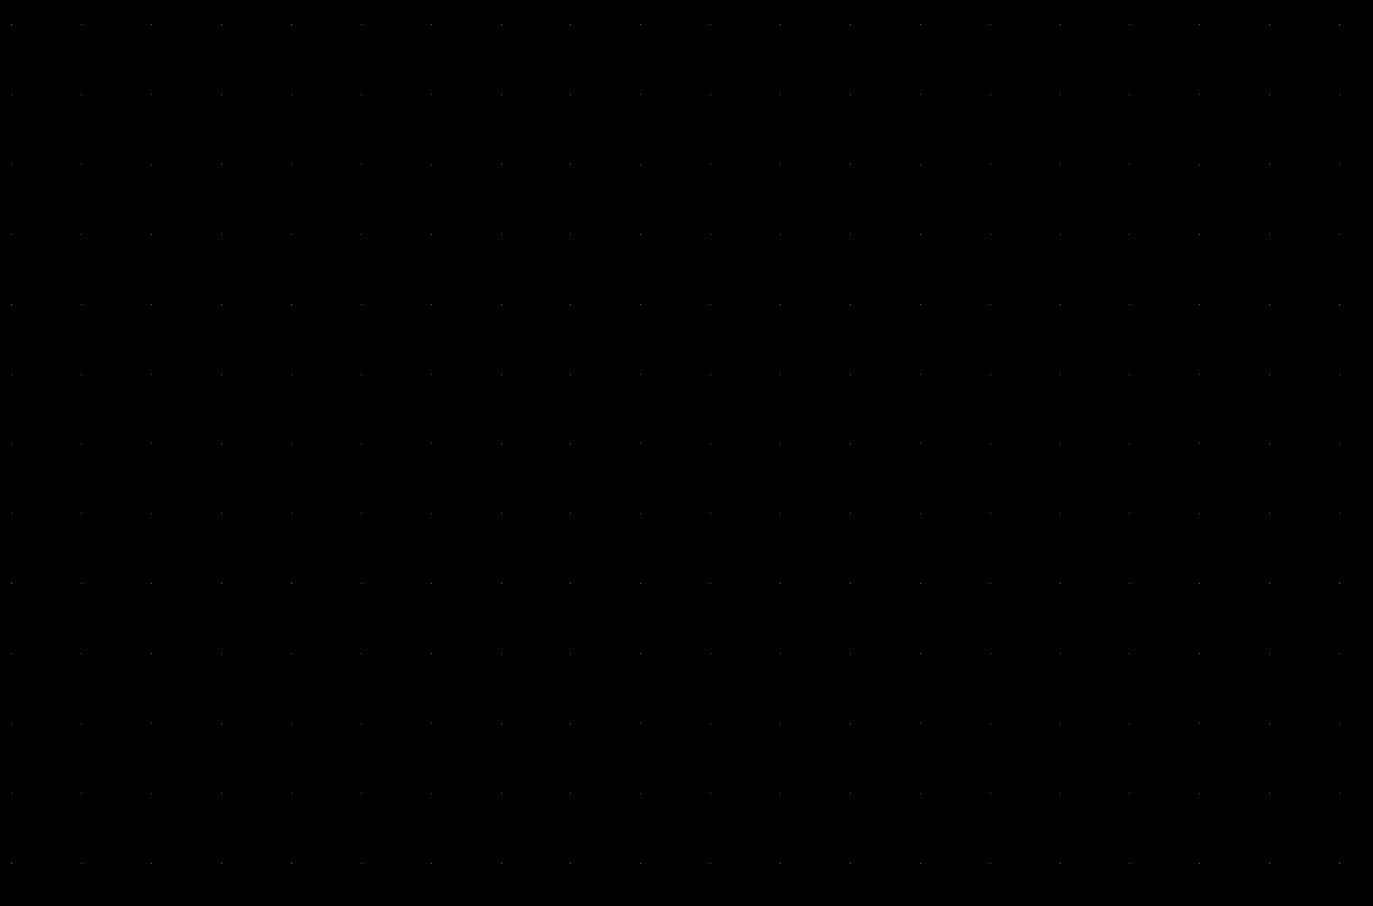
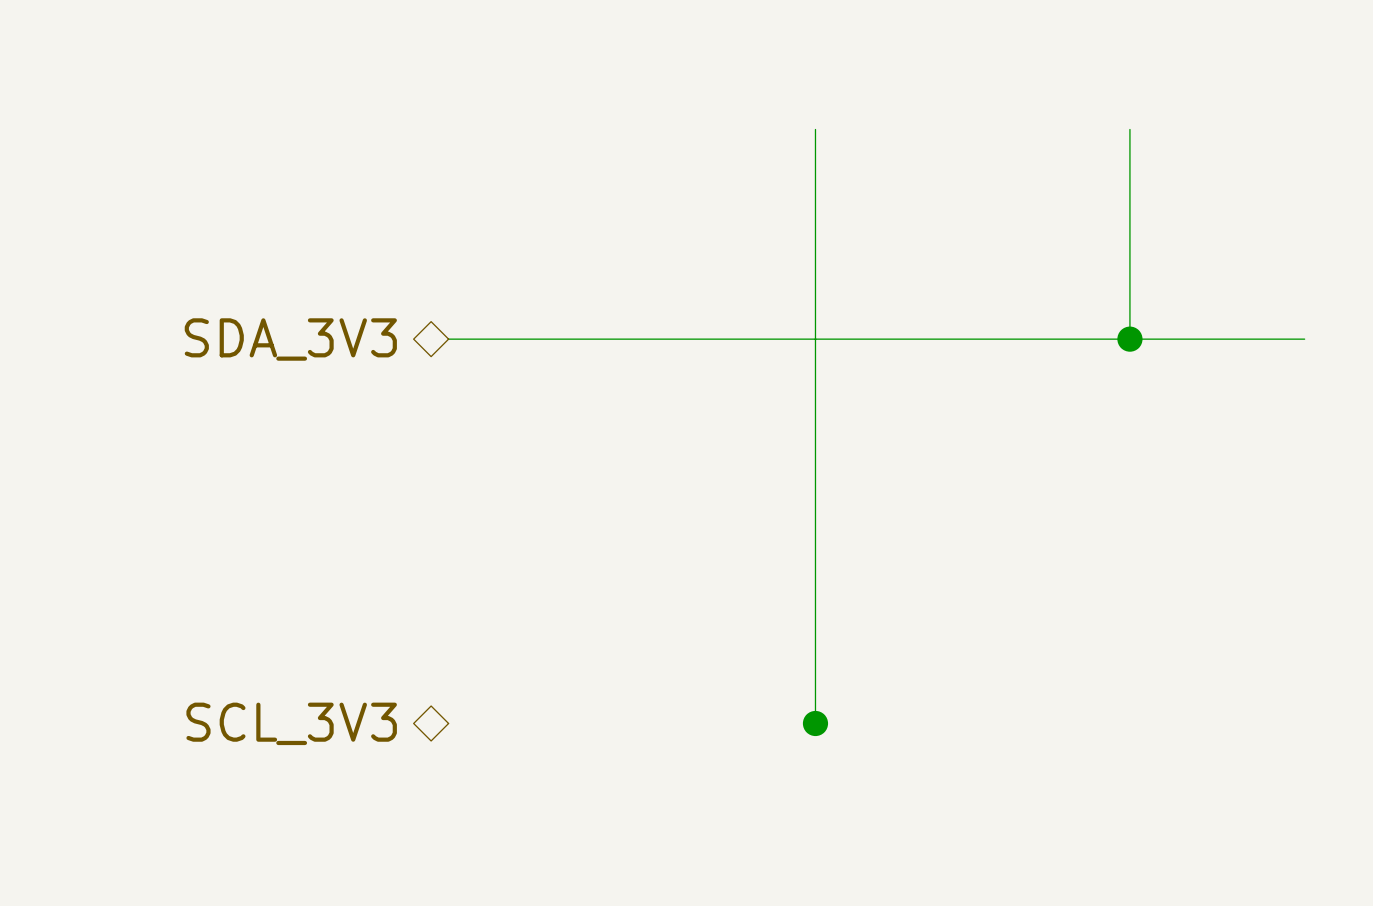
wire: none -> (815, 129) (815, 723)
wire: none -> (1129, 129) (1129, 339)
wire: none -> (448, 339) (1304, 339)
junction: none -> (1129, 339)
hierarchical label: none -> SDA_3V3 (290, 339)
junction: none -> (815, 723)
hierarchical label: none -> SCL_3V3 (291, 723)

